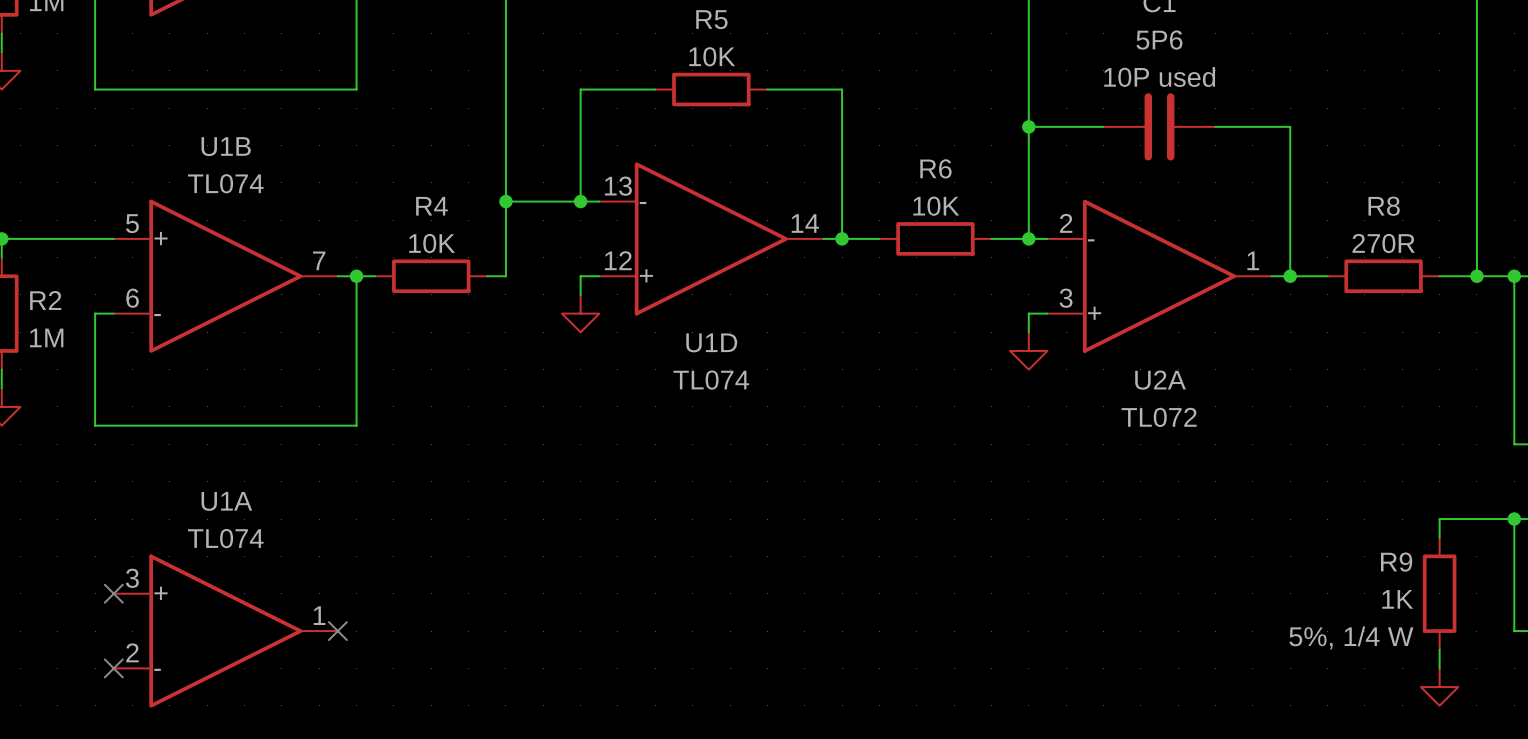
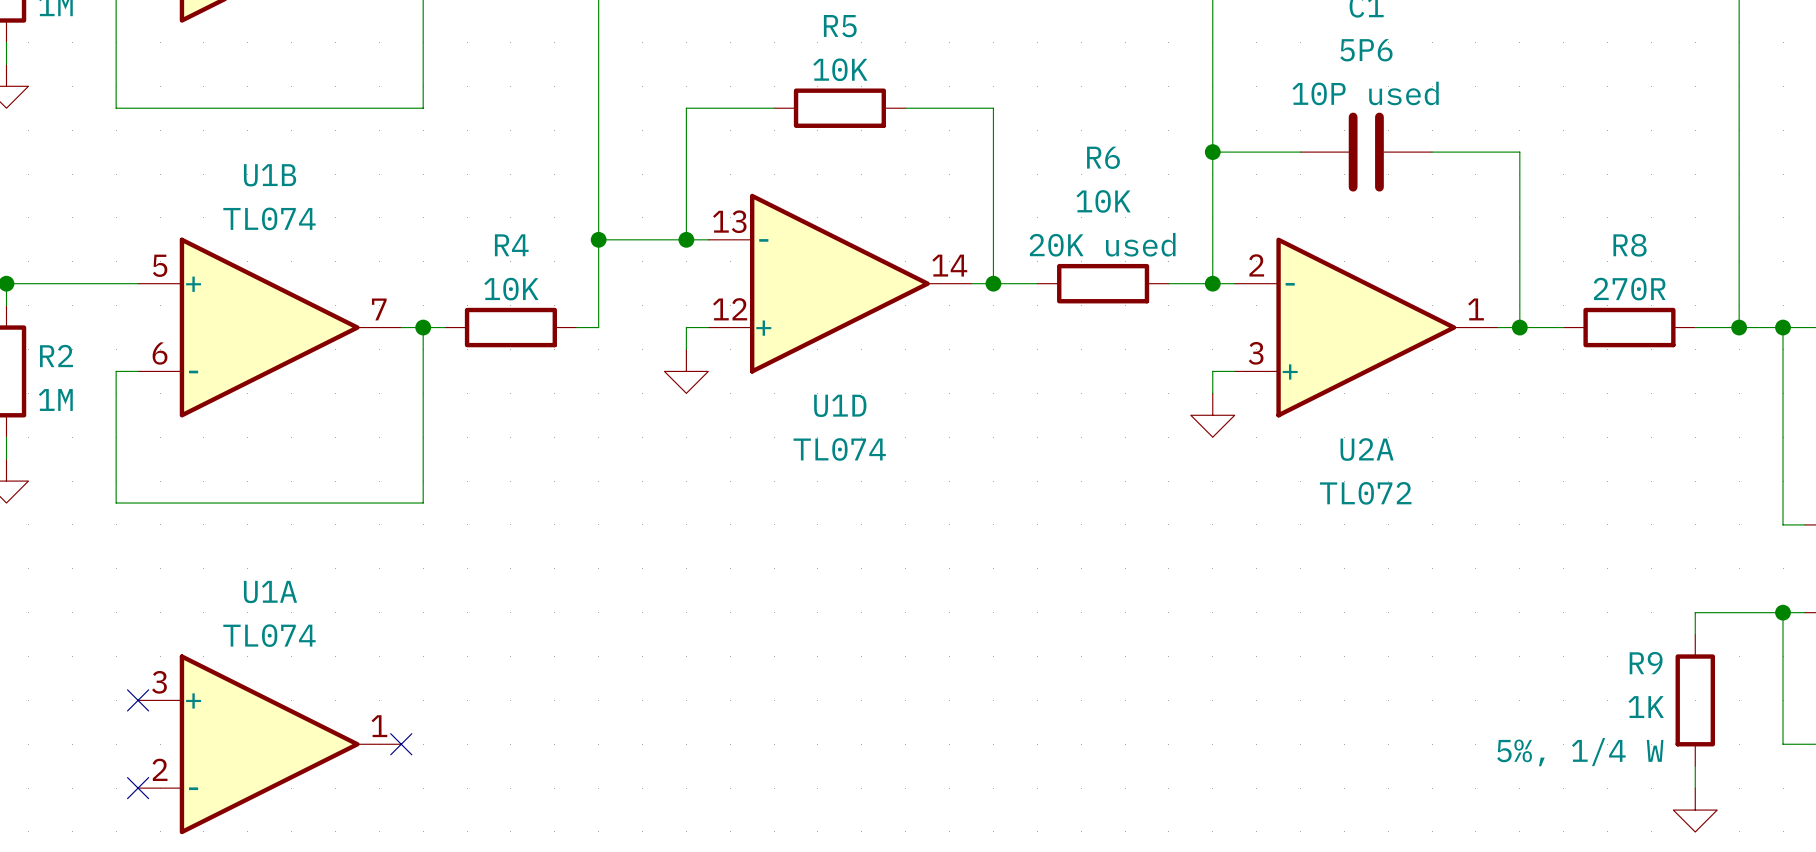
R6 name position: R6 (935, 168) -> R6 (1103, 157)
R6 text: none -> 20K used (1102, 244)
R6 value position: 10K (936, 206) -> 10K (1103, 201)

